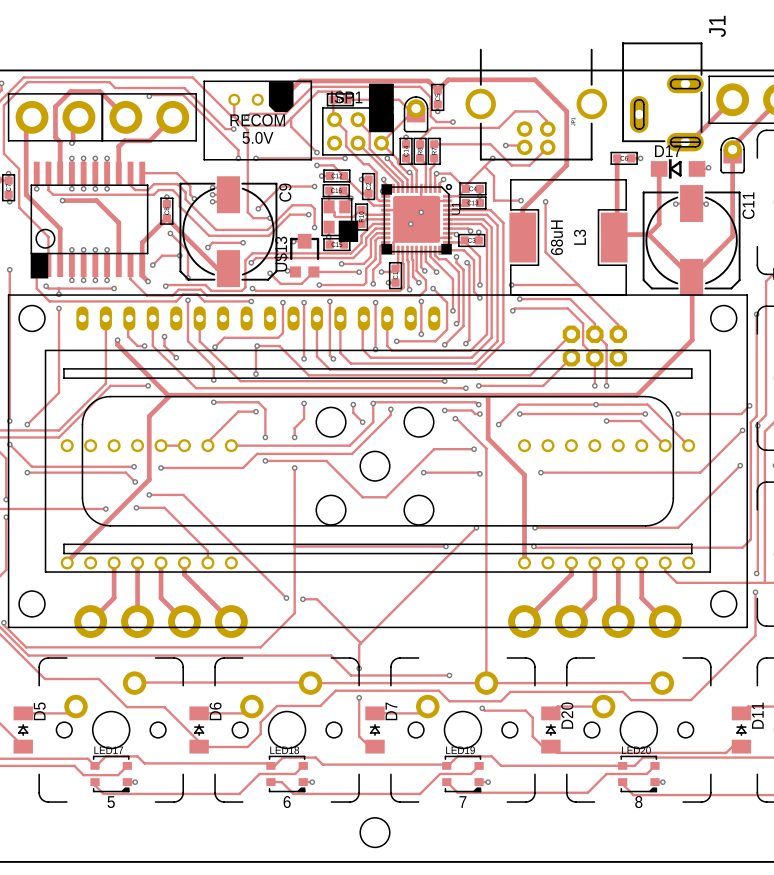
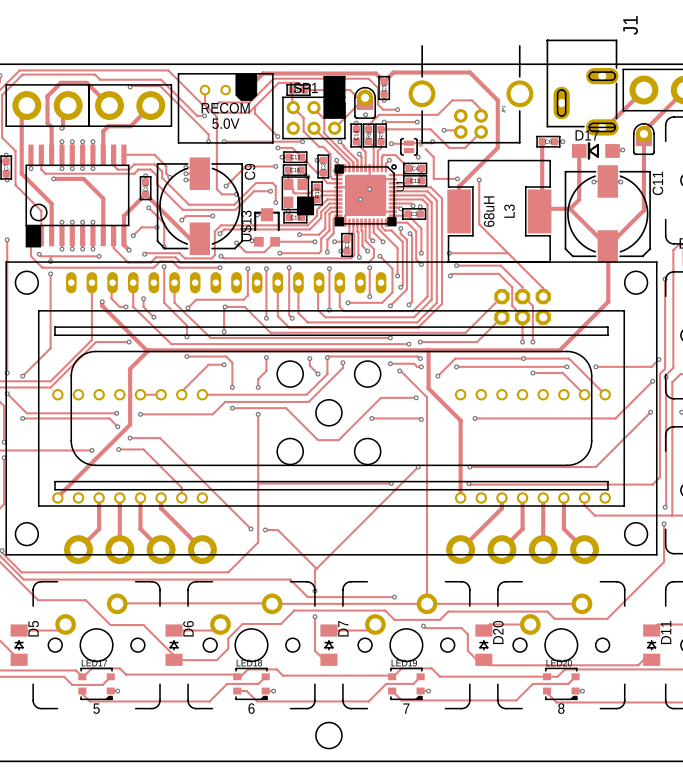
via: none -> (365, 114)
track: none -> (384, 122) (417, 122)
via: none -> (384, 122)
via: none -> (417, 122)
track: (381, 143) (397, 159) (397, 163) (412, 176) -> (360, 156) (361, 157)
track: (491, 160) (465, 185) -> (431, 143) (391, 143)
part: none -> (408, 146)
via position: (436, 173) -> (391, 143)
via: none -> (418, 157)

